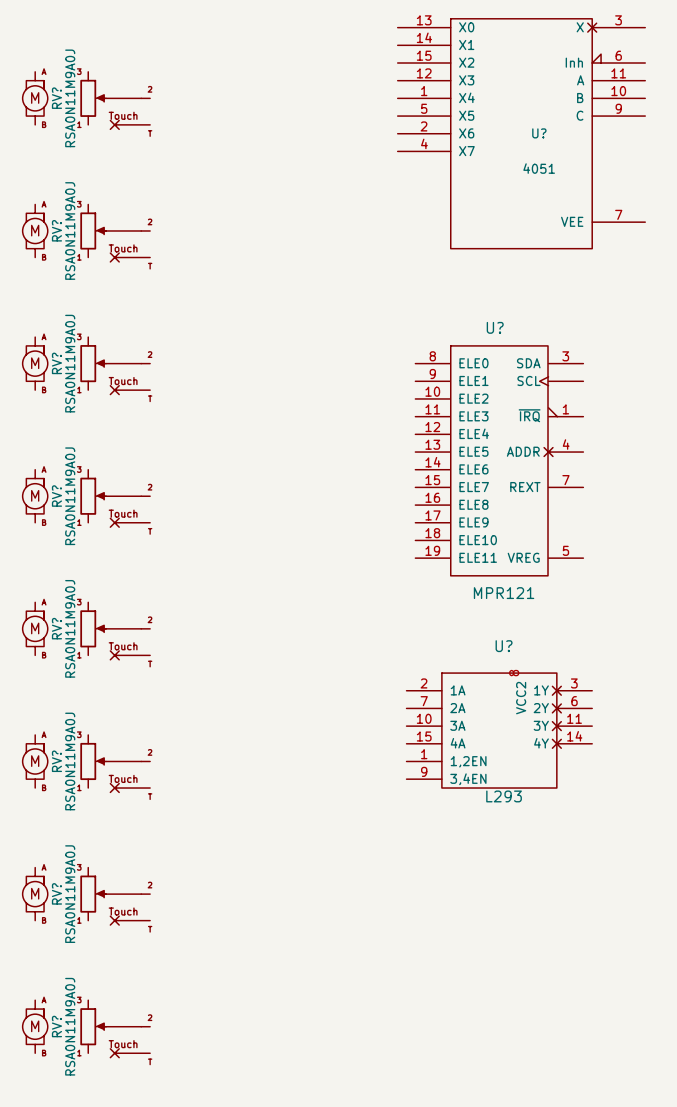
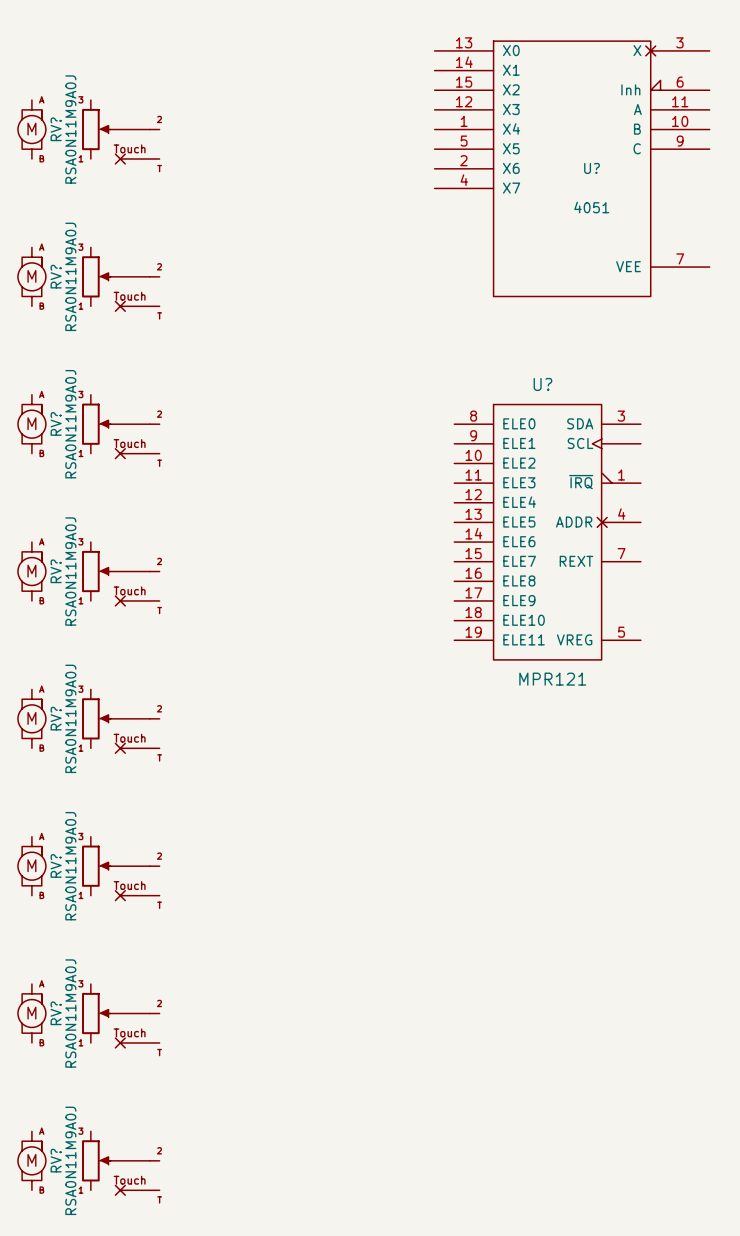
U?: L293 (499, 730) -> none

